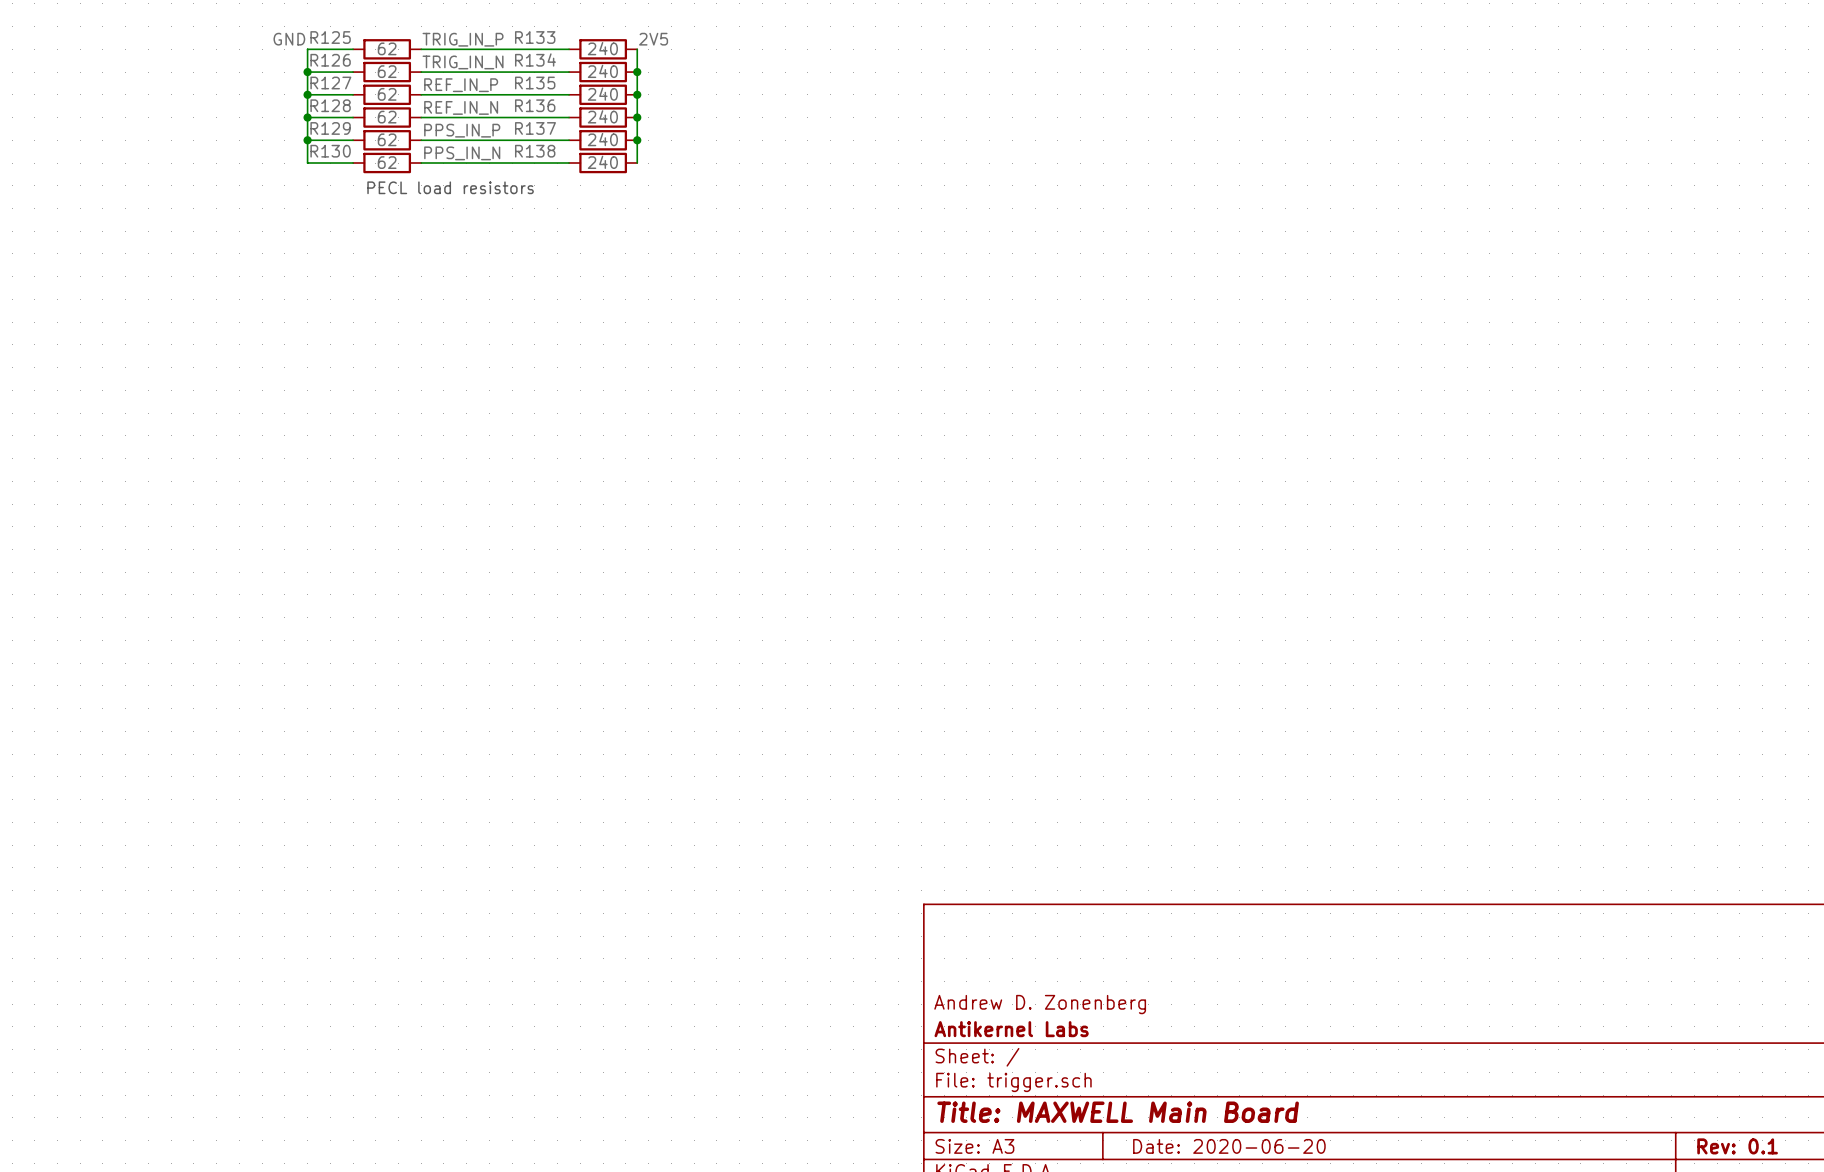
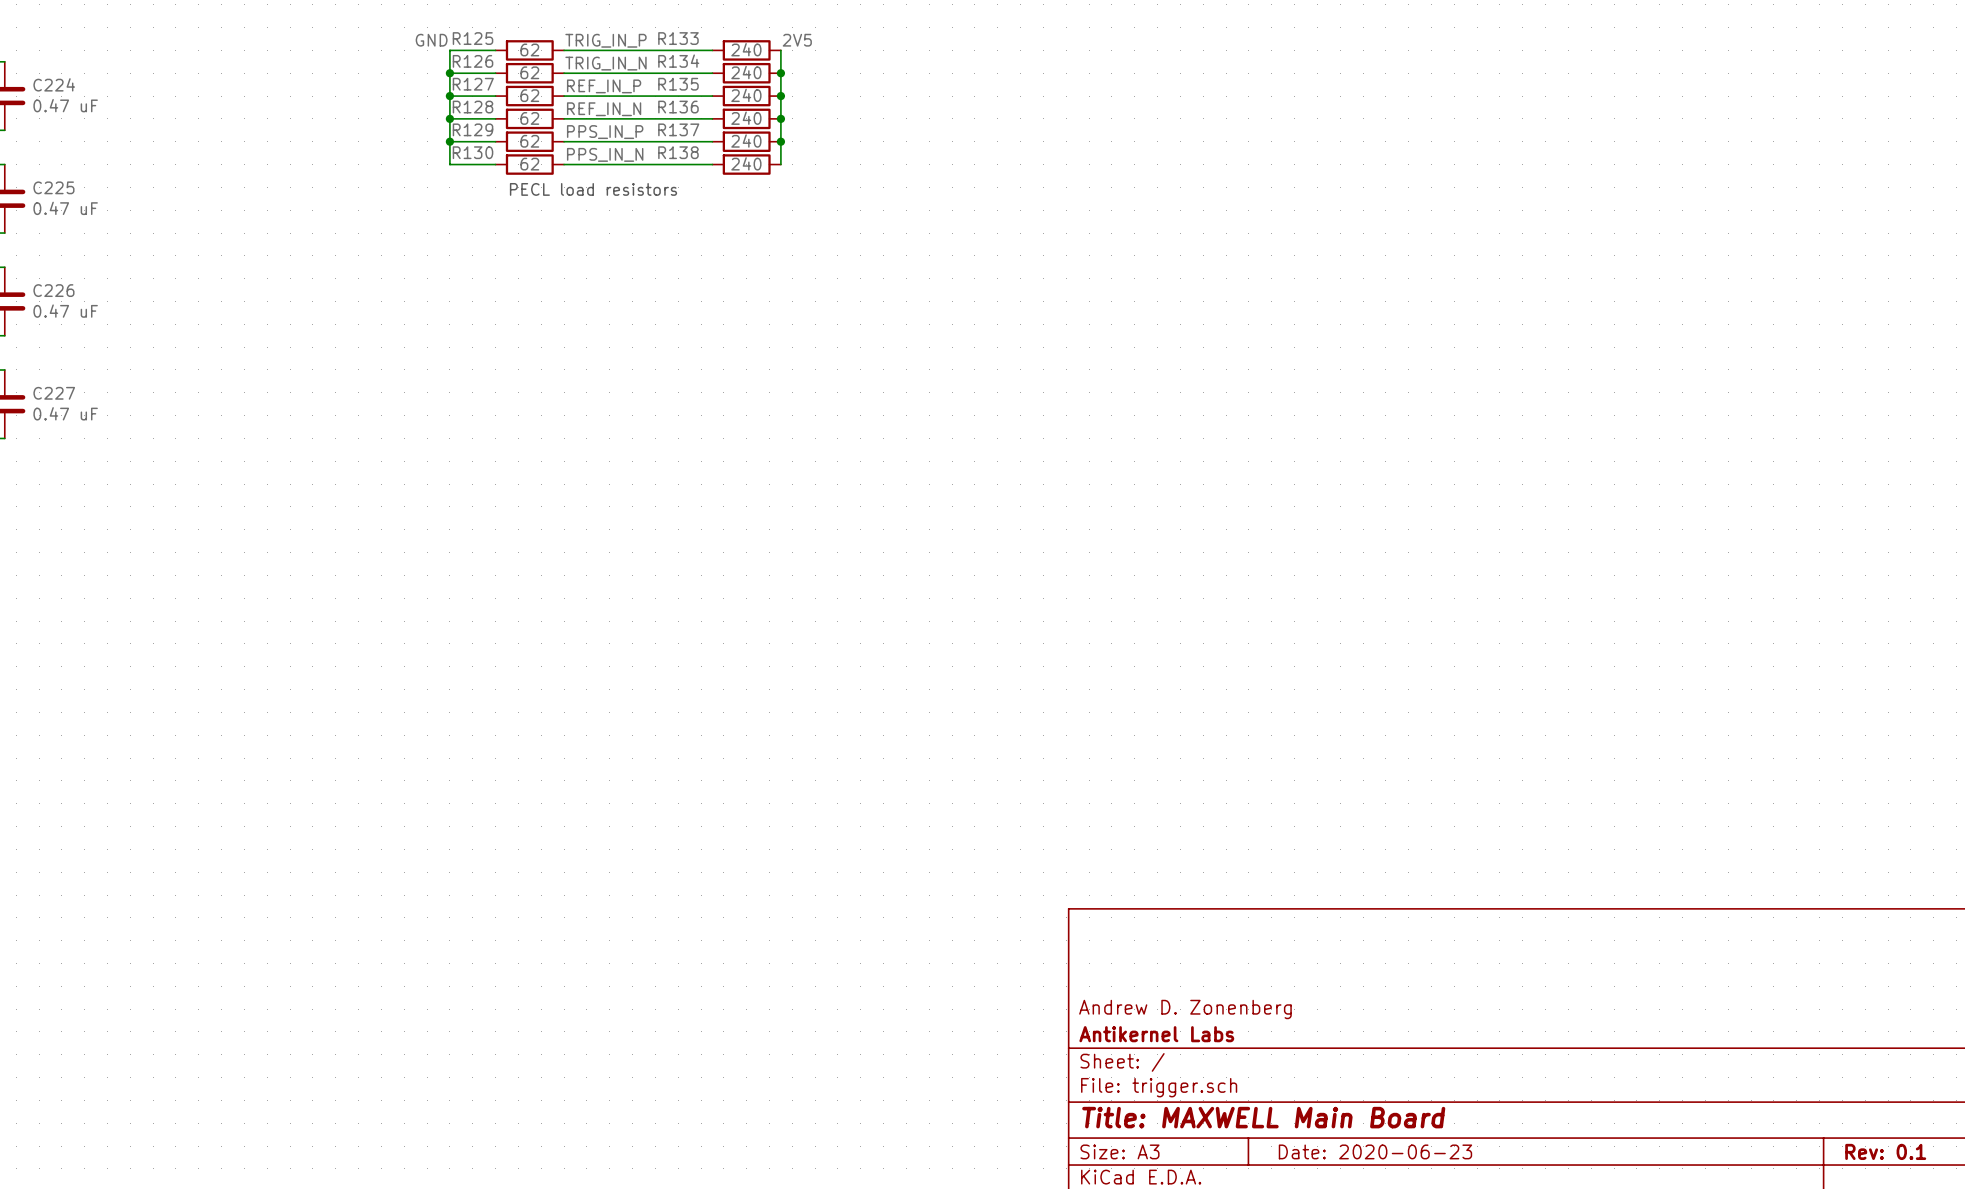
title block: Date: 2020-06-20 (1229, 1146) -> Date: 2020-06-23 (1375, 1151)

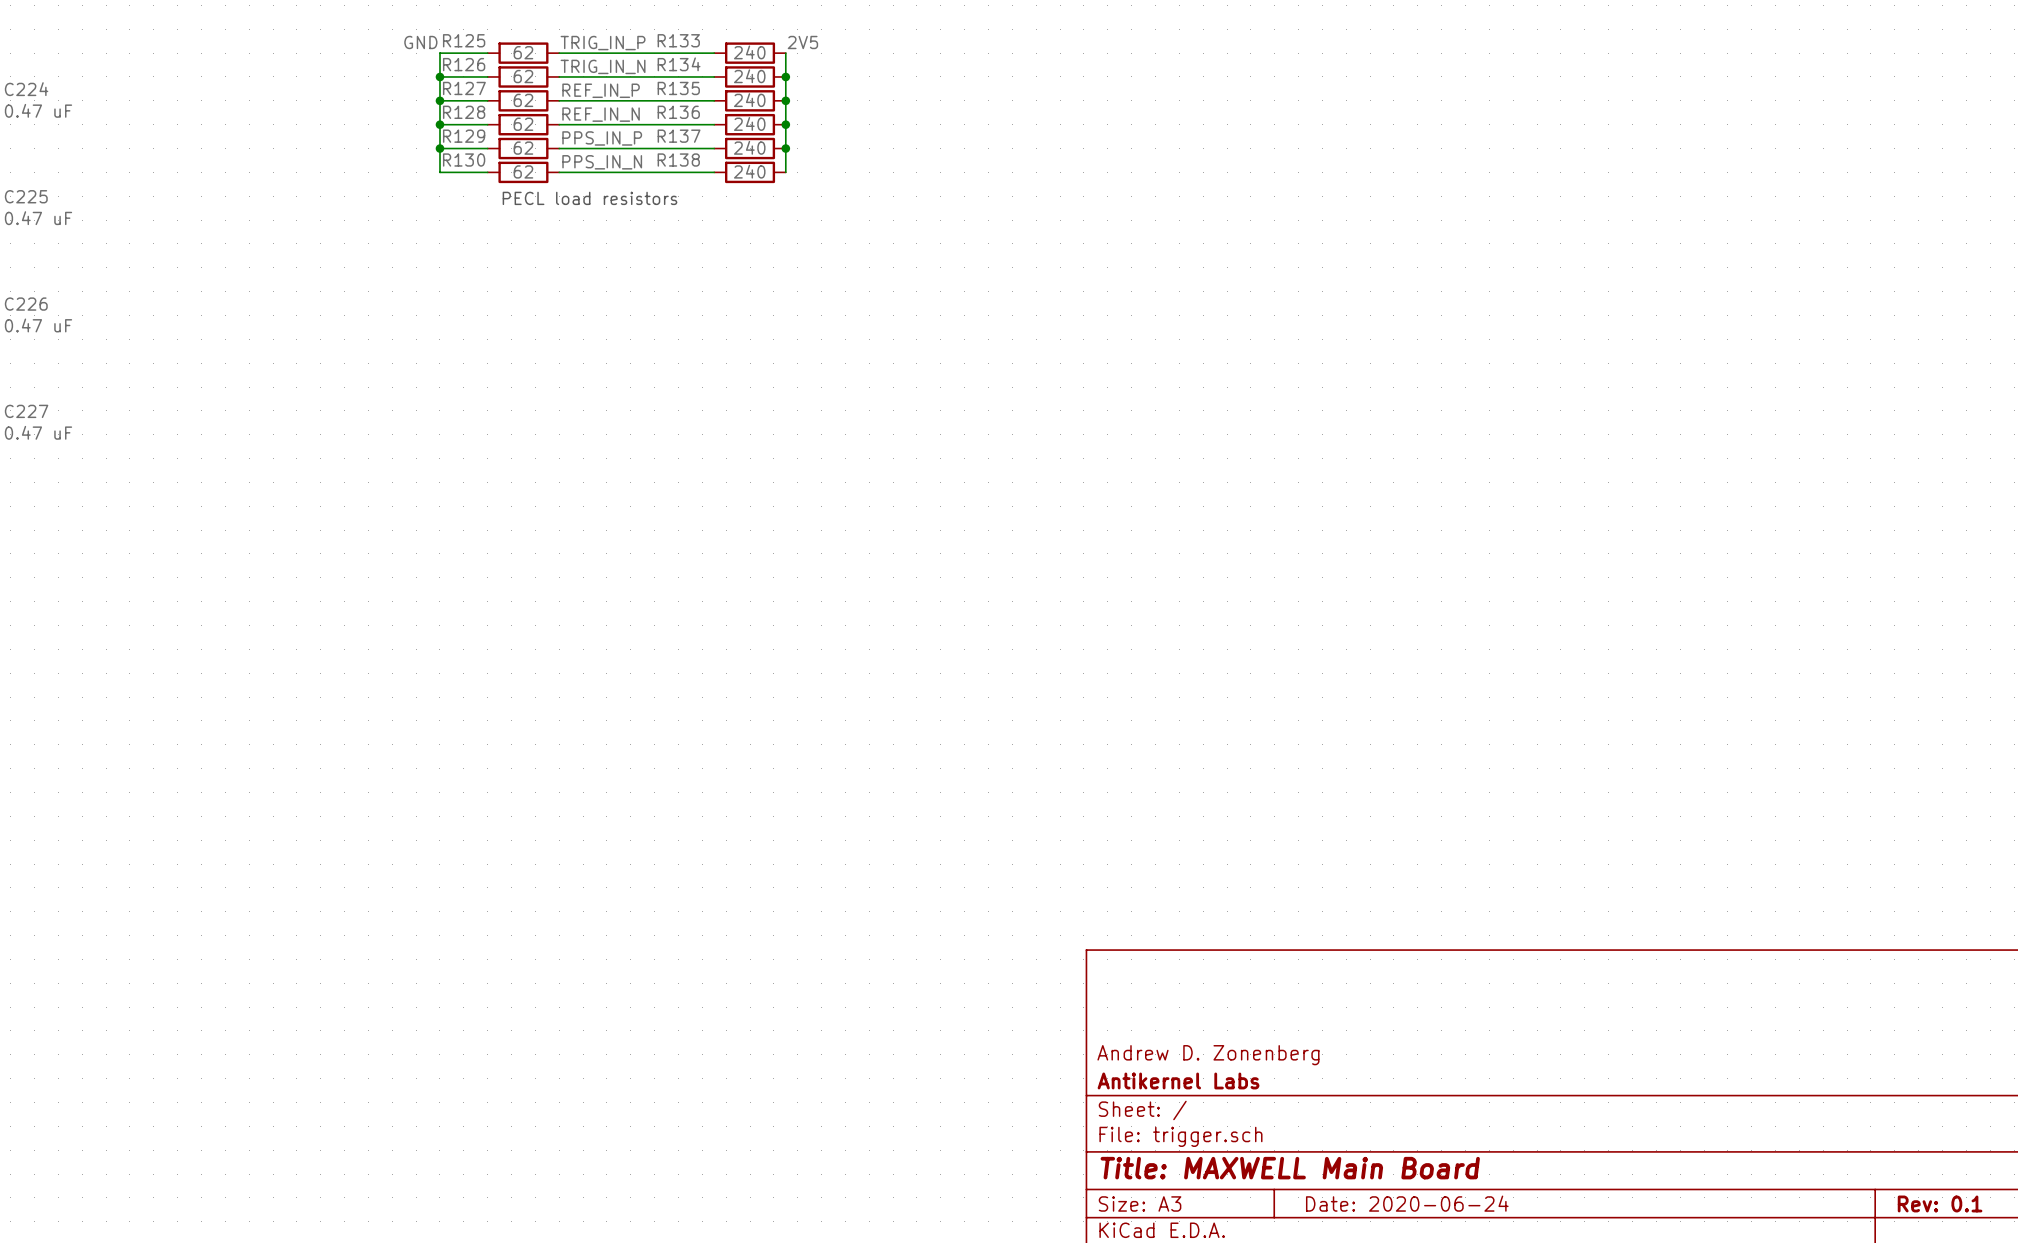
title block: Date: 2020-06-23 (1375, 1151) -> Date: 2020-06-24 (1407, 1203)

